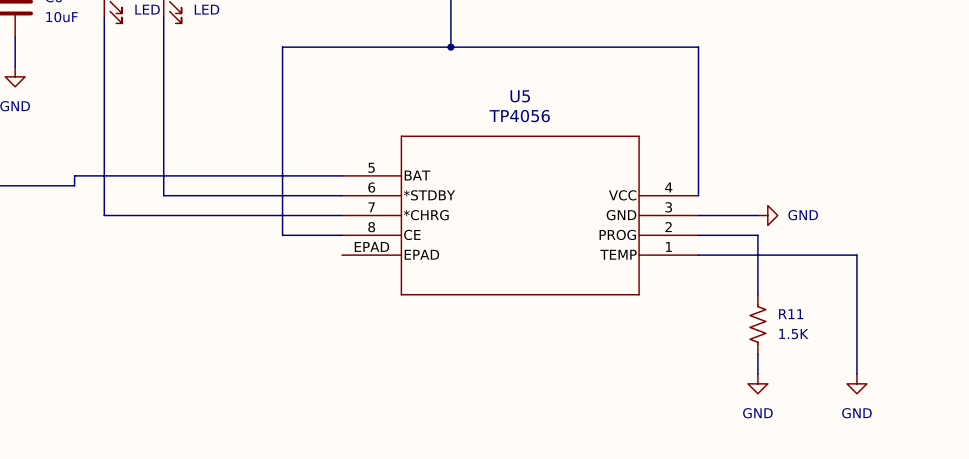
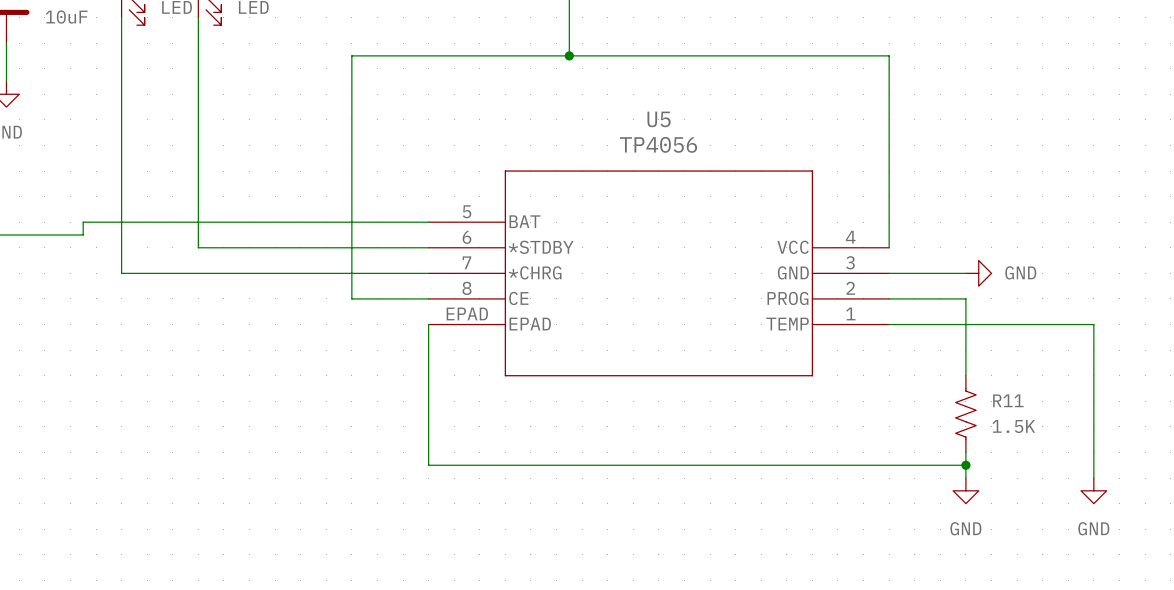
wire: none -> (428, 324) (428, 465) (965, 465)
junction: none -> (965, 465)

